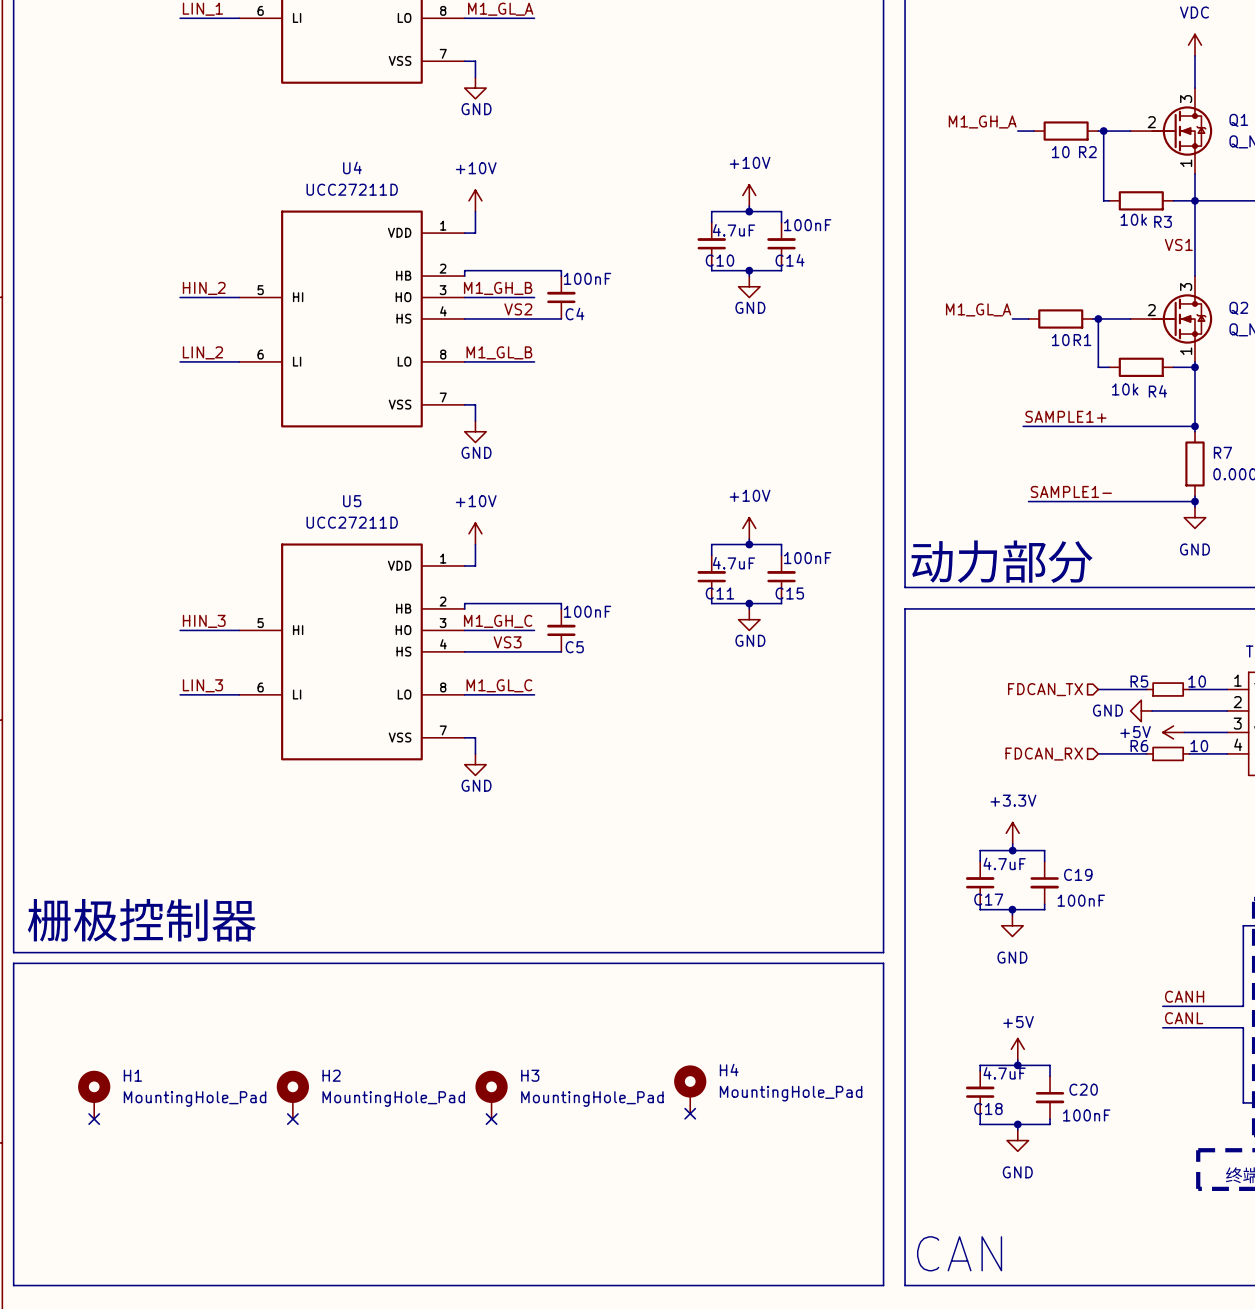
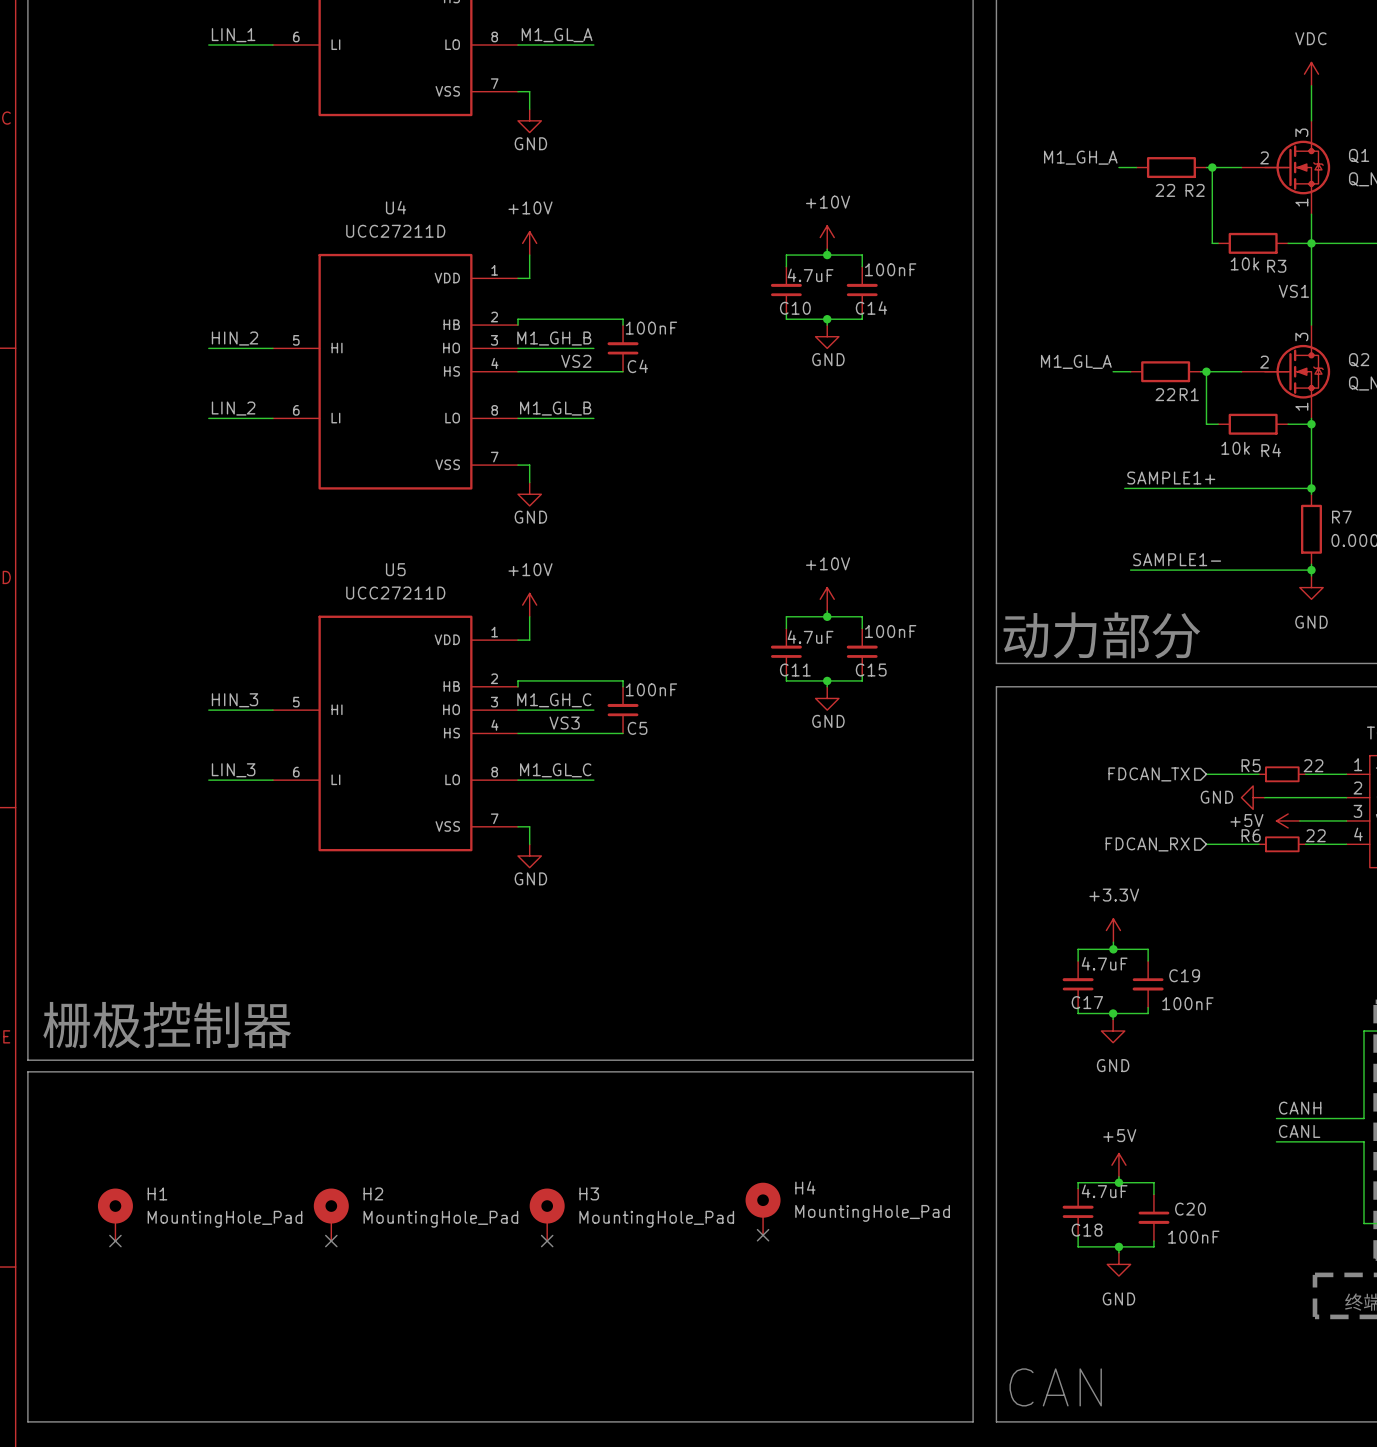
R2 value: 10 (1060, 152) -> 22 (1165, 190)
R1 value: 10 (1060, 340) -> 22 (1165, 394)
R5 value: 10 (1197, 681) -> 22 (1313, 765)
R6 value: 10 (1199, 746) -> 22 (1315, 835)

